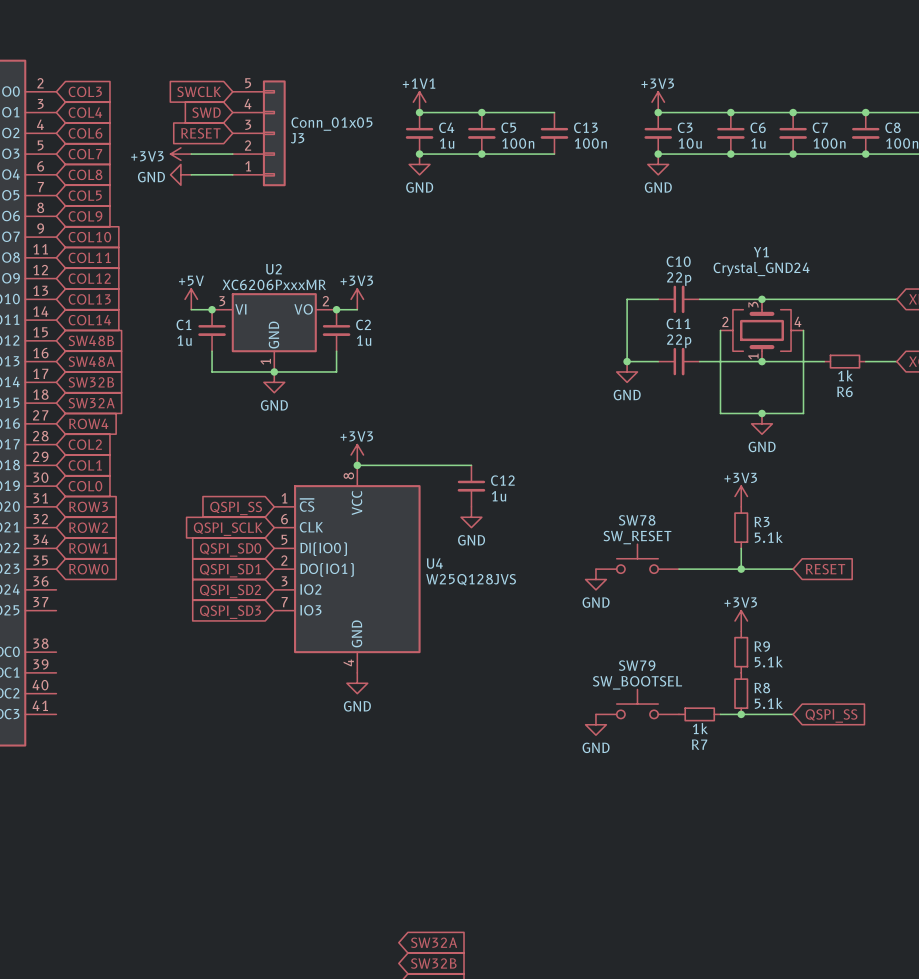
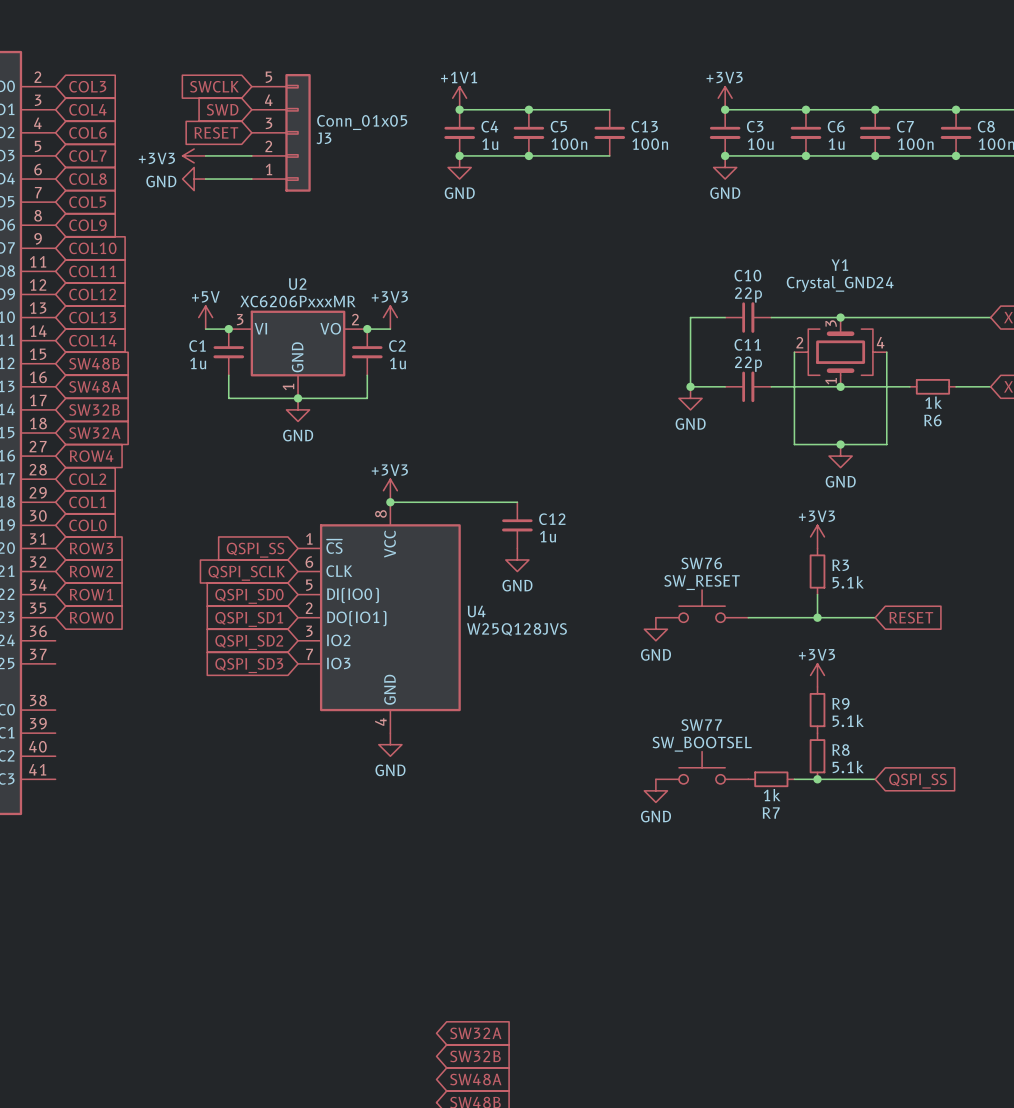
SW78 name: SW78 (637, 520) -> SW76 (701, 563)
SW79 name: SW79 (637, 665) -> SW77 (701, 725)

